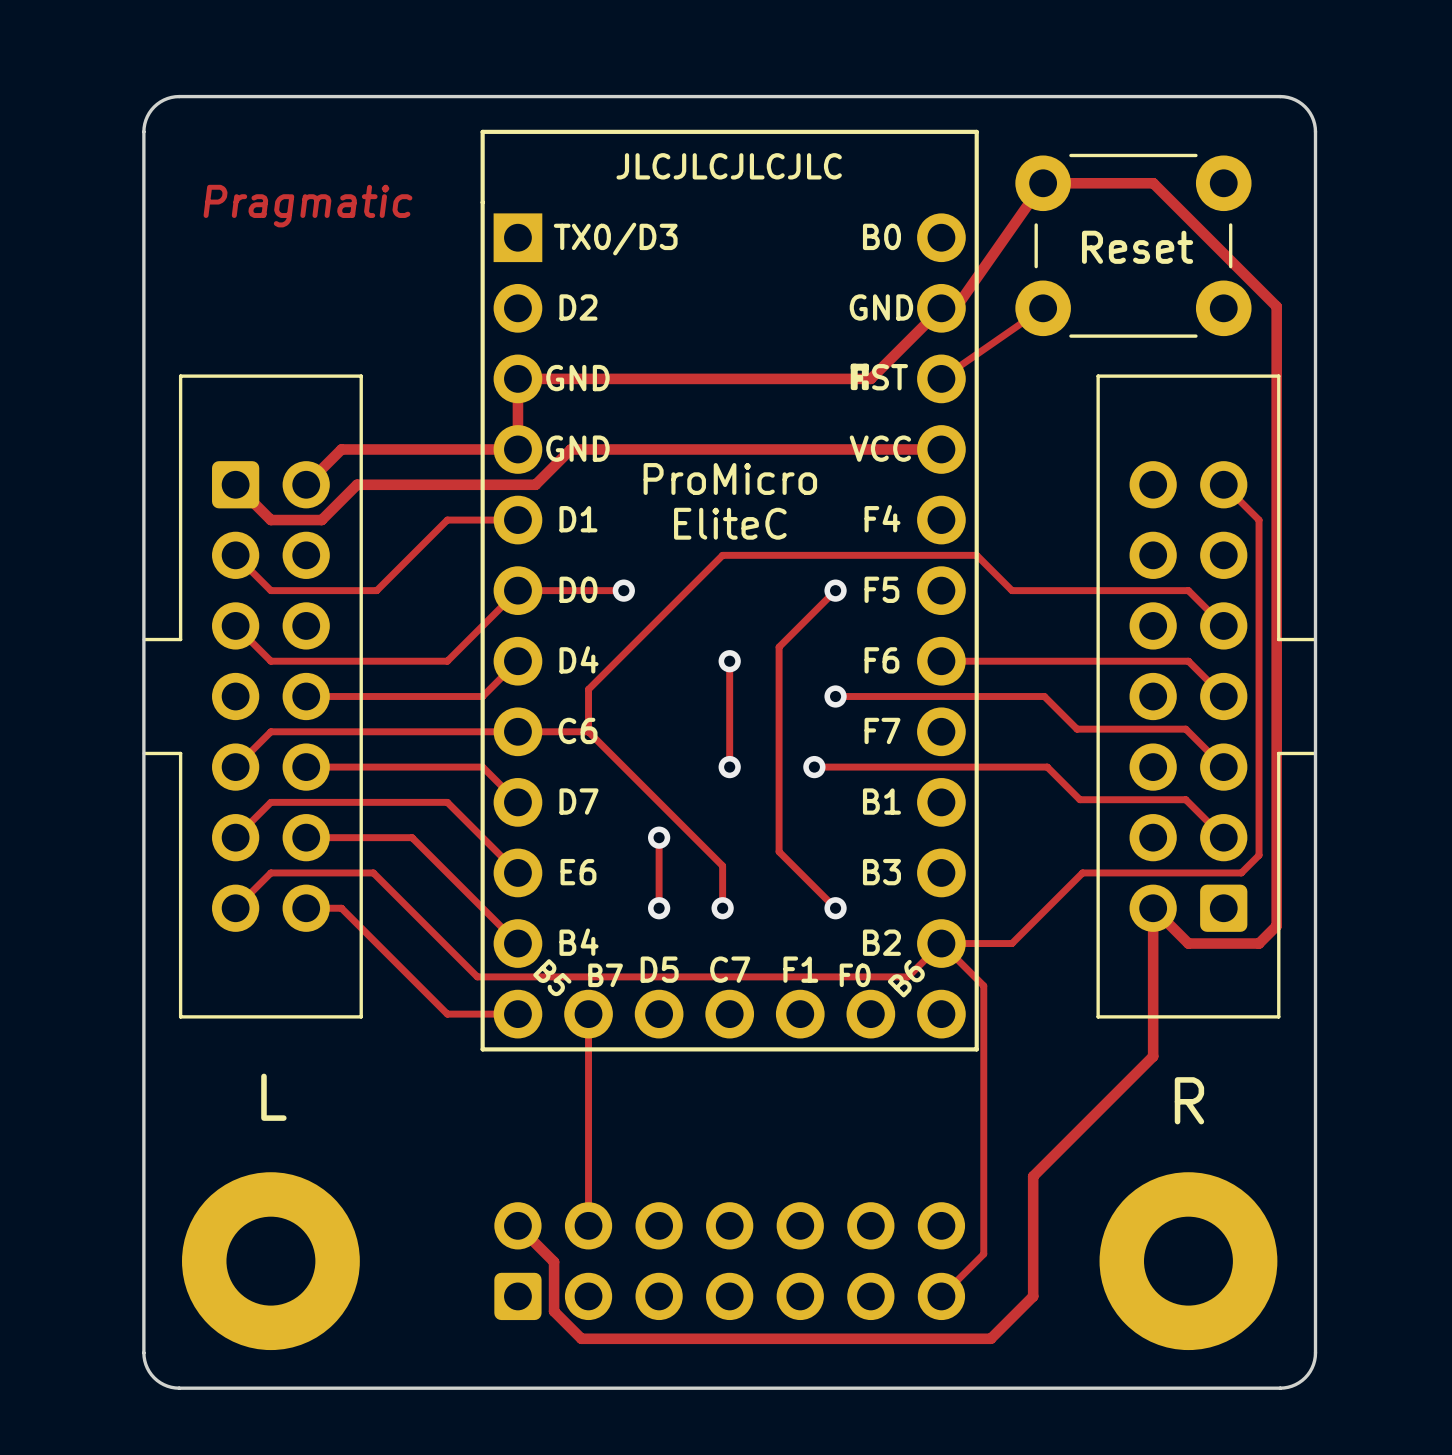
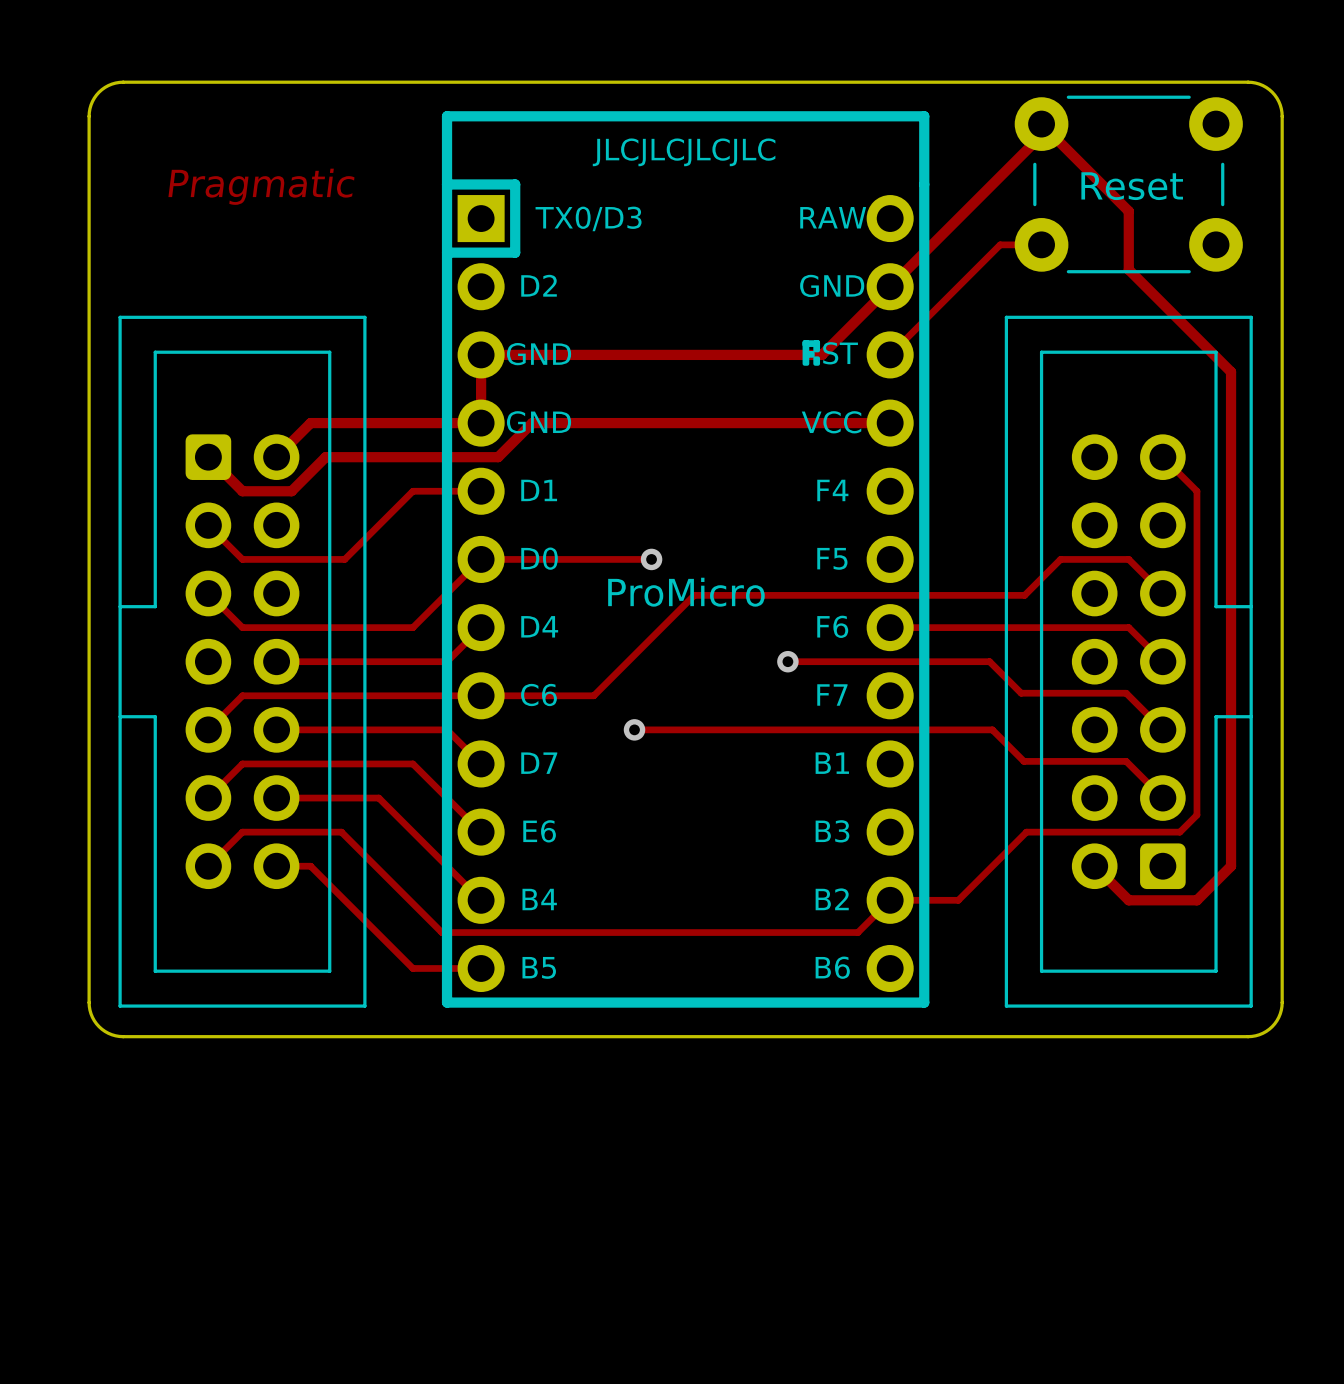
board edge: (179, 96) (163, 100) (154, 106) (145, 120) (143, 131) (143, 1352) (147, 1368) (154, 1377) (163, 1384) (179, 1388) (1280, 1388) (1295, 1384) (1307, 1374) (1313, 1364) (1315, 1352) (1315, 131) (1313, 120) (1305, 106) (1291, 98) (1280, 96) -> (153, 82) (119, 82) (108, 85) (94, 98) (89, 116) (89, 1002) (92, 1017) (99, 1026) (108, 1033) (123, 1036) (1248, 1036) (1259, 1034) (1269, 1029) (1278, 1017) (1282, 1002) (1282, 116) (1276, 98) (1262, 85) (1251, 82) (1217, 82)
part footprint: [480, 129, 979, 1052] -> [441, 111, 930, 1008]
text position: Pragmatic (307, 206) -> Pragmatic (261, 186)
part position: (1133, 245) -> (1128, 184)
track: (955, 308) (1043, 183) (1153, 183) (1276, 306) (1276, 925) -> (890, 286) (1041, 135) (1041, 124) (1128, 211) (1128, 269) (1231, 371) (1231, 866) (1214, 883)
track: (1043, 308) (941, 378) -> (1041, 244) (1000, 244) (890, 354)
part footprint: [142, 374, 363, 1019] -> [118, 315, 367, 1008]
part footprint: [1096, 374, 1317, 1019] -> [1004, 315, 1253, 1008]
text: ProMicro (730, 479) -> none
text: EliteC (730, 523) -> none
track: none -> (583, 559) (651, 559)
via: (623, 590) -> none
via: none -> (651, 559)
track: (835, 590) (779, 647) (779, 851) (835, 908) -> none
via: (835, 590) -> none
track: (1117, 590) (1012, 590) (976, 555) (722, 555) (588, 689) (588, 731) (722, 865) (722, 908) -> (1060, 559) (1024, 595) (694, 595) (593, 695) (549, 695)
part value: none -> ProMicro (686, 592)
track: (729, 661) (729, 767) -> none
via: (729, 661) -> none
track: none -> (634, 729) (767, 729)
via: none -> (634, 729)
via: (729, 767) -> none
via: (814, 767) -> none
track: (659, 837) (659, 908) -> none
via: (659, 837) -> none
via: (659, 908) -> none
via: (722, 908) -> none
via: (835, 908) -> none
track: (1153, 908) (1153, 1056) (1033, 1176) (1033, 1296) (990, 1338) (581, 1338) (554, 1311) (554, 1261) (517, 1225) -> none
track: (941, 943) (983, 985) (983, 1254) (941, 1296) -> none
track: (588, 1014) (588, 1225) -> none
part value: L (273, 1097) -> none
part value: R (1189, 1100) -> none
part: (270, 1261) -> none
part: (729, 1261) -> none
part: (1188, 1261) -> none

